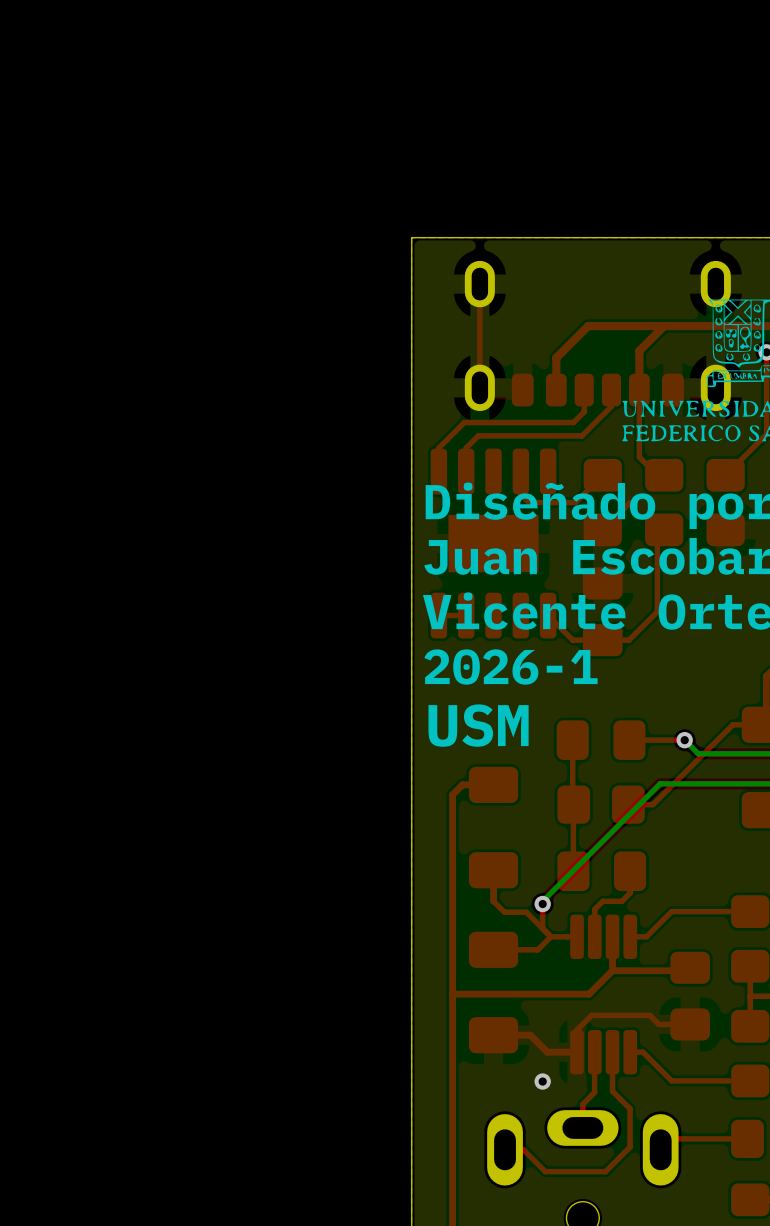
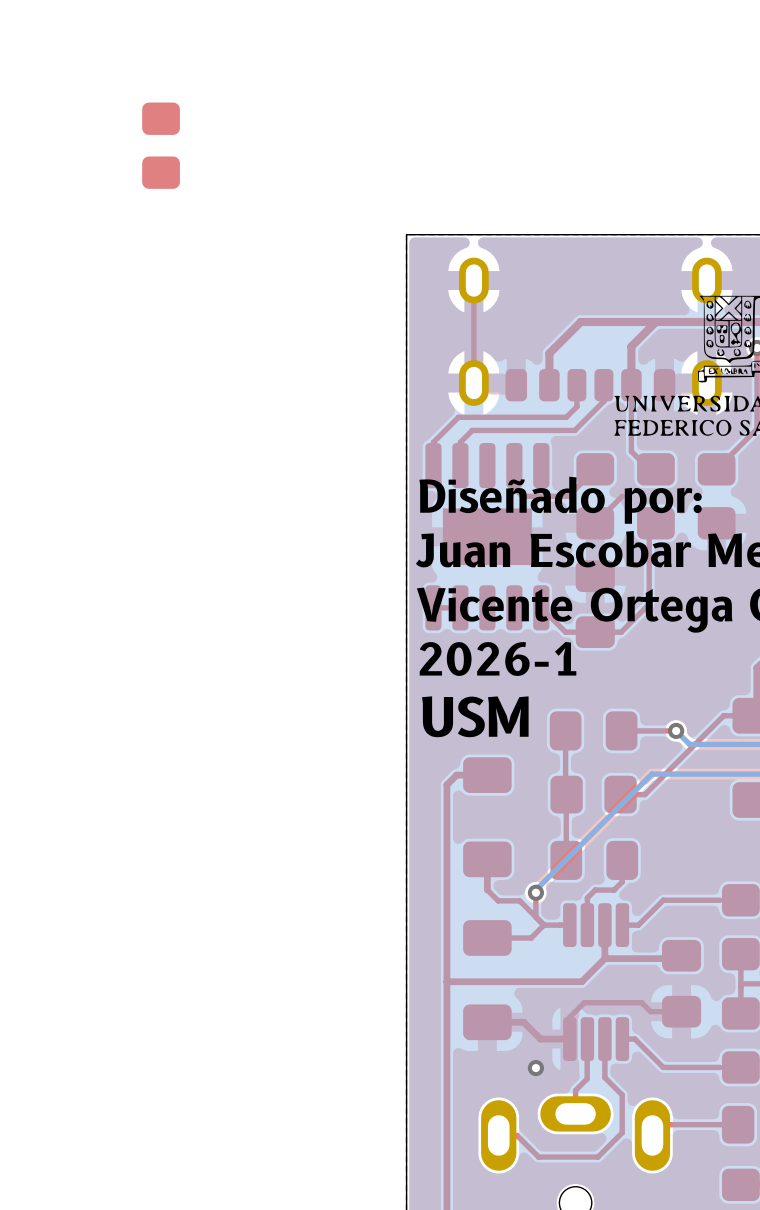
part: none -> (161, 145)

